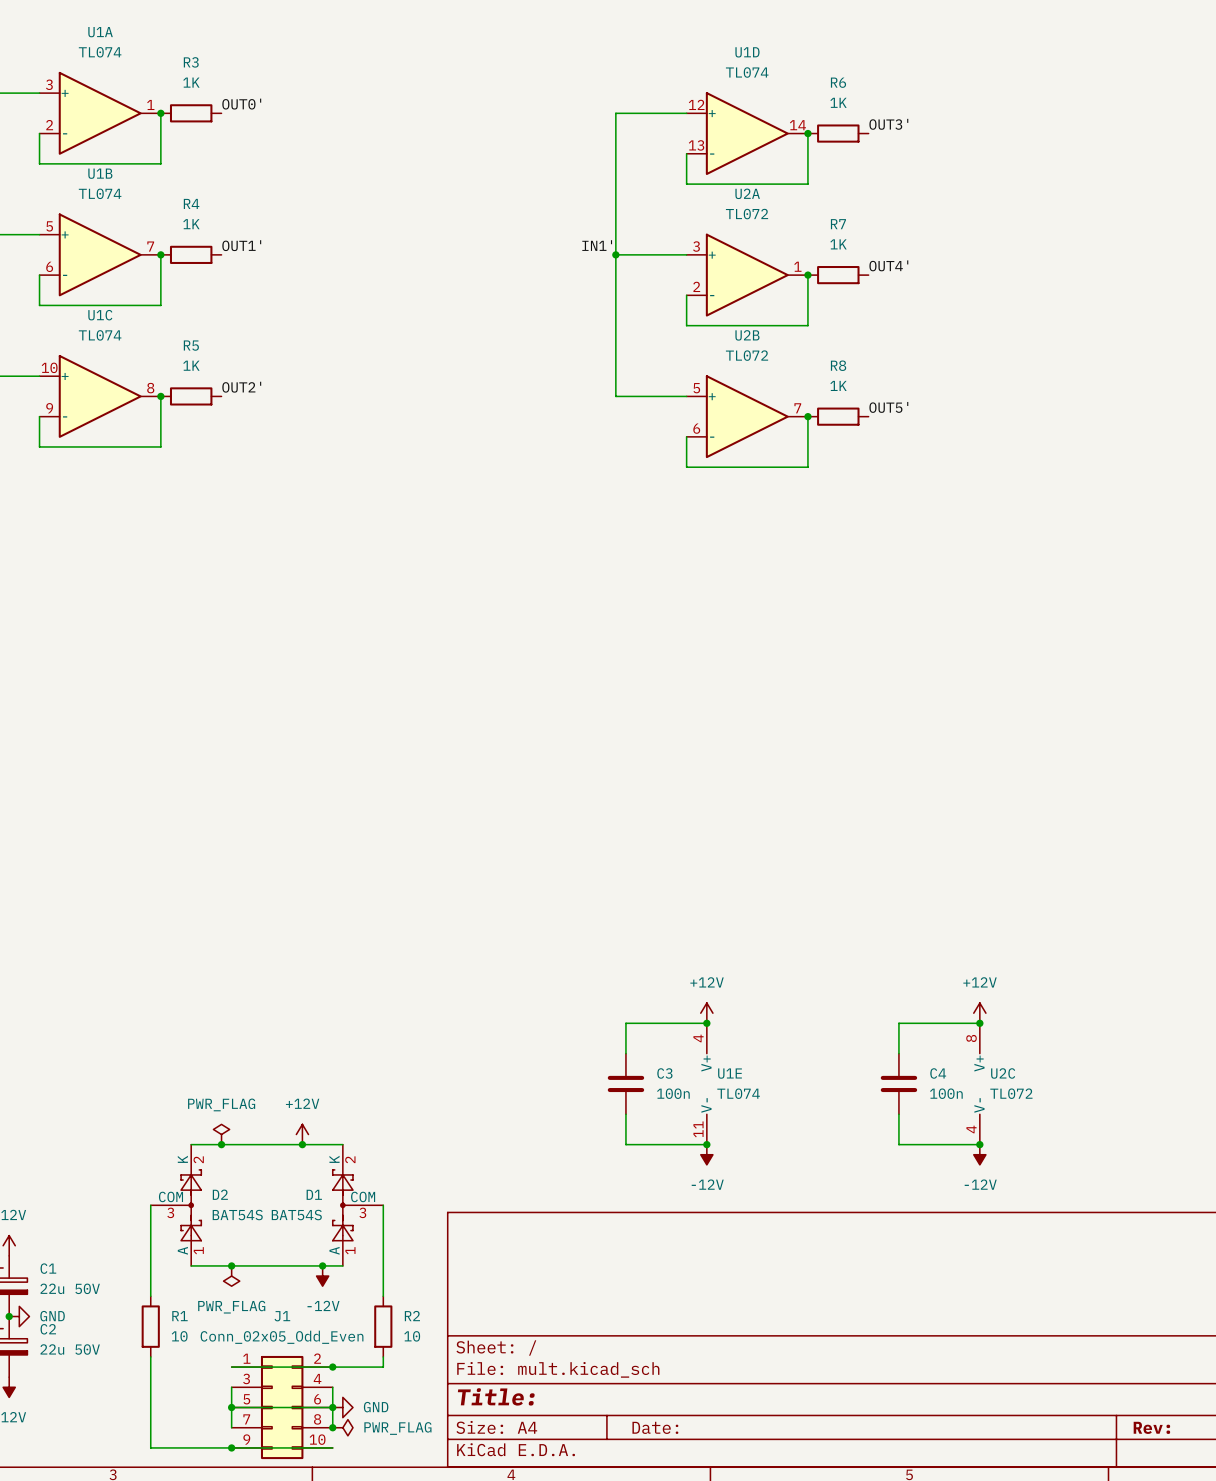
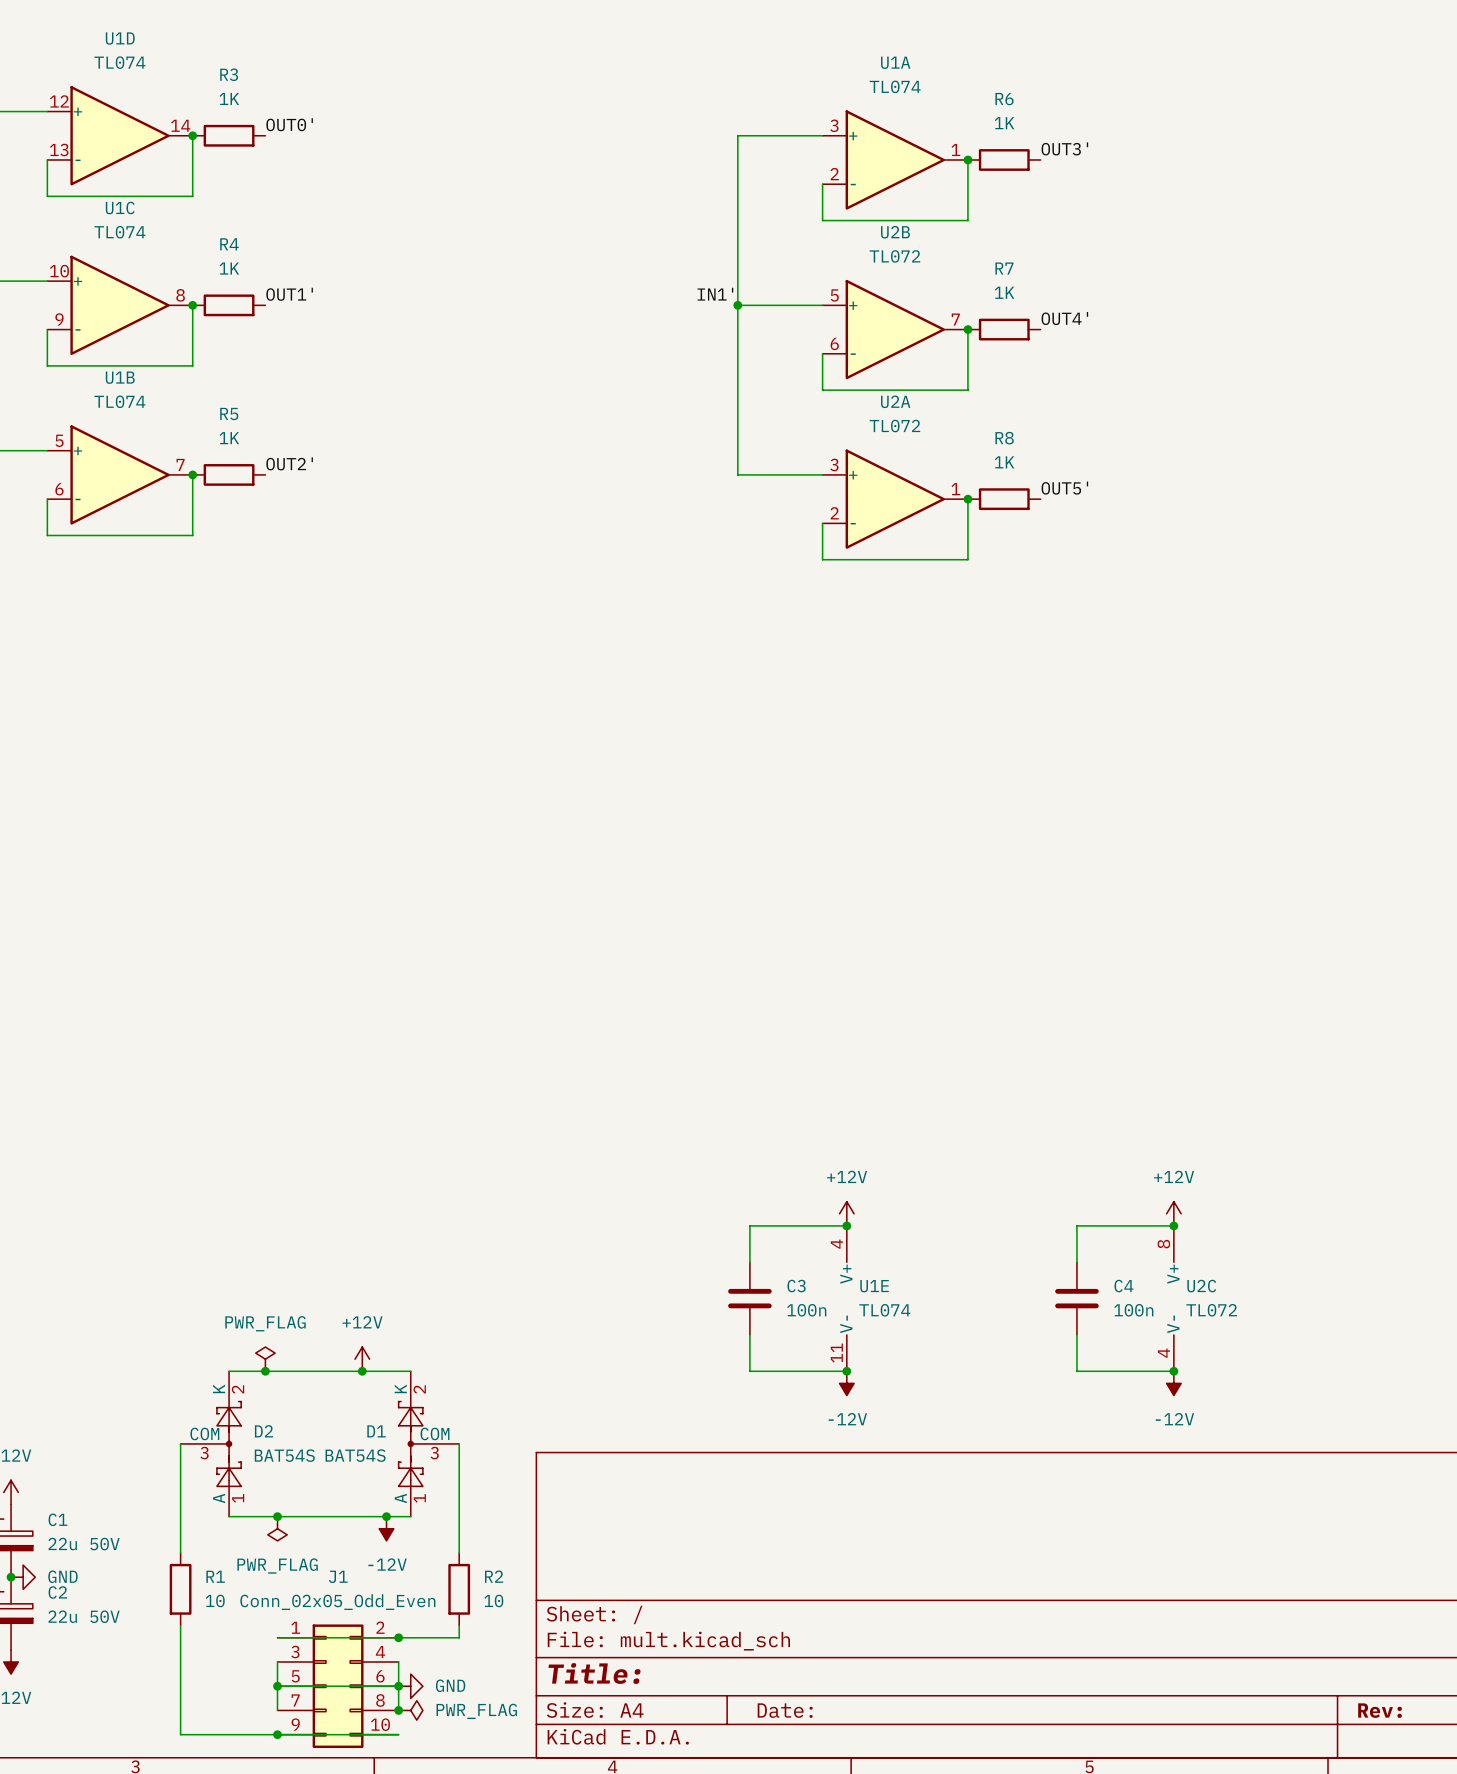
U1A position: (100, 113) -> (895, 159)
U1D position: (747, 133) -> (120, 135)
U1B position: (100, 254) -> (120, 474)
U2A position: (747, 275) -> (895, 499)
U1C position: (100, 396) -> (120, 305)
U2B position: (747, 416) -> (895, 329)

